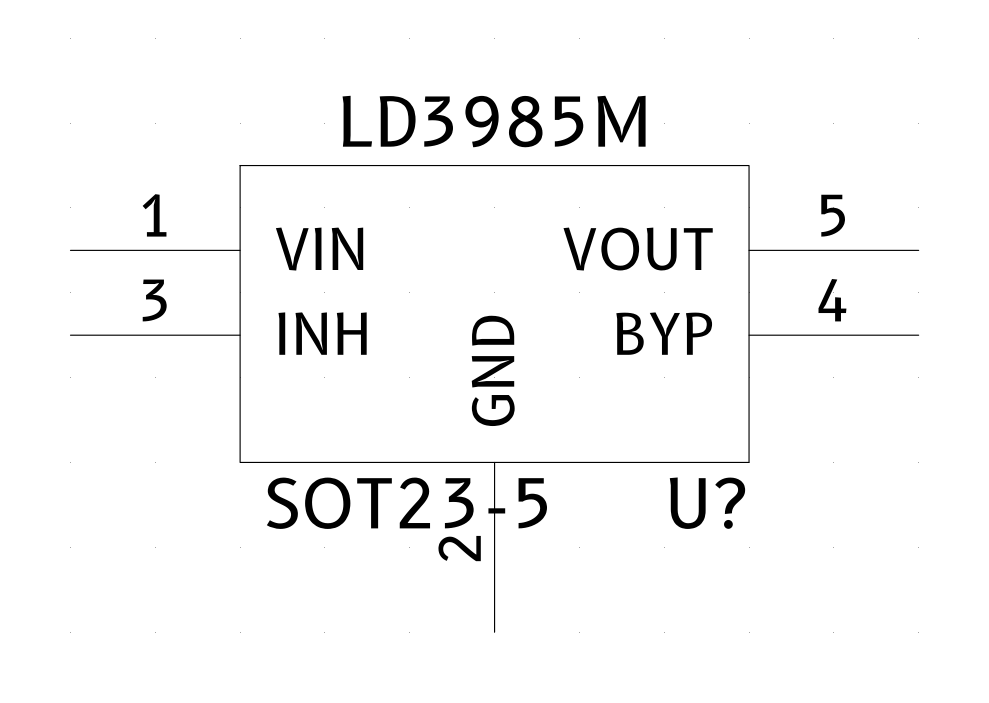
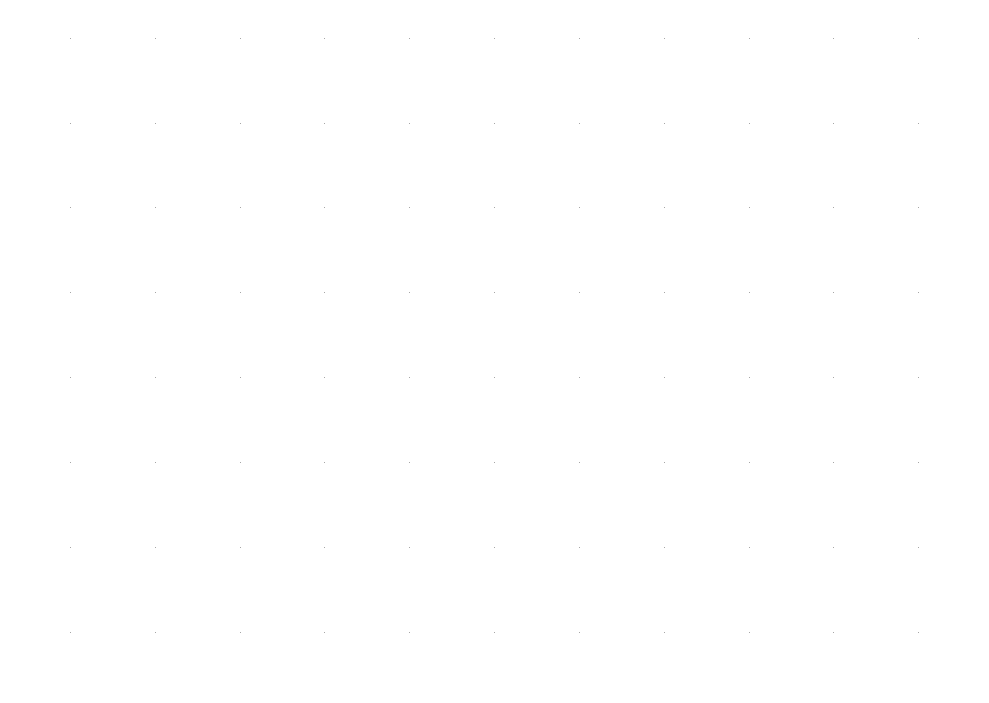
U?: LD3985M (494, 398) -> none

